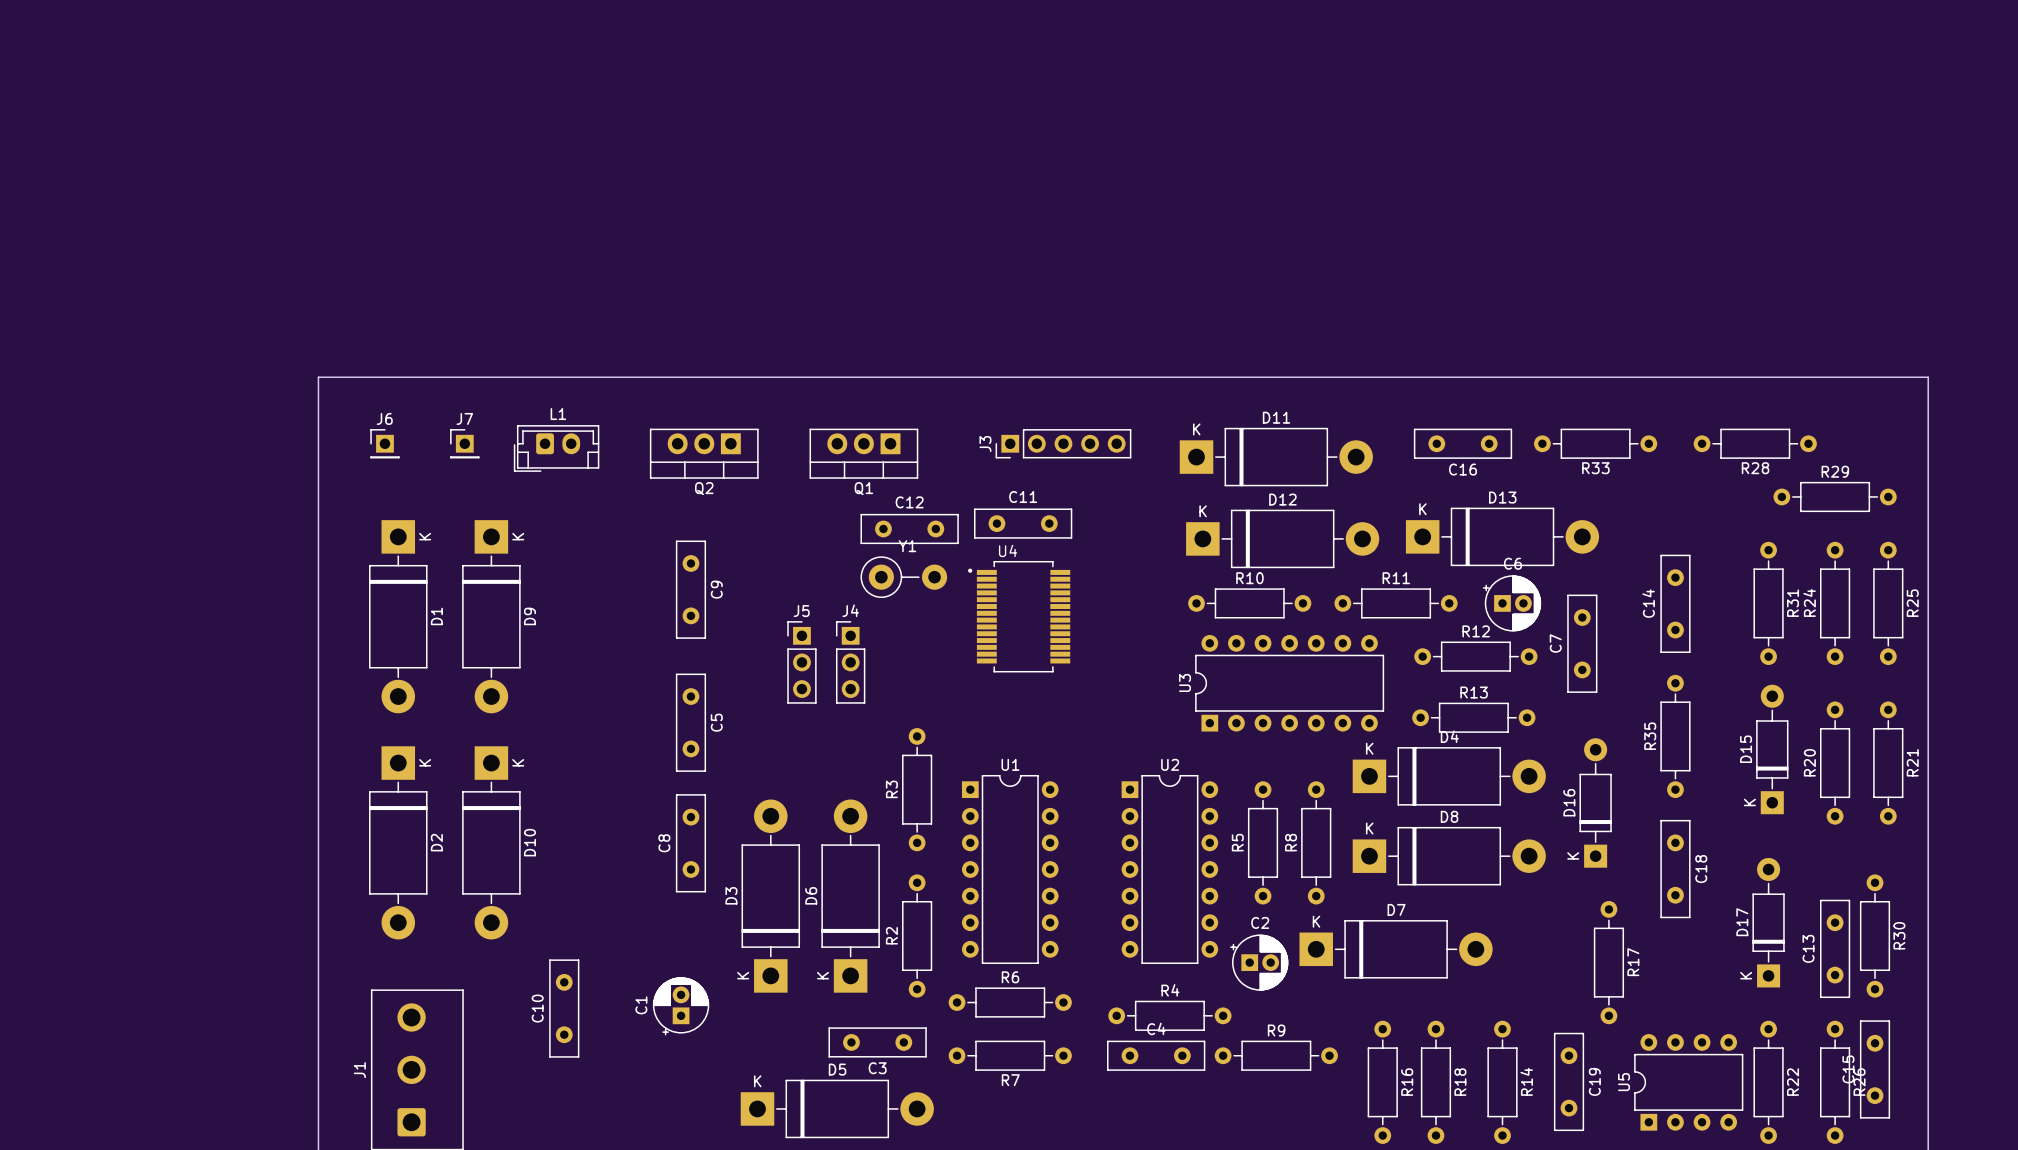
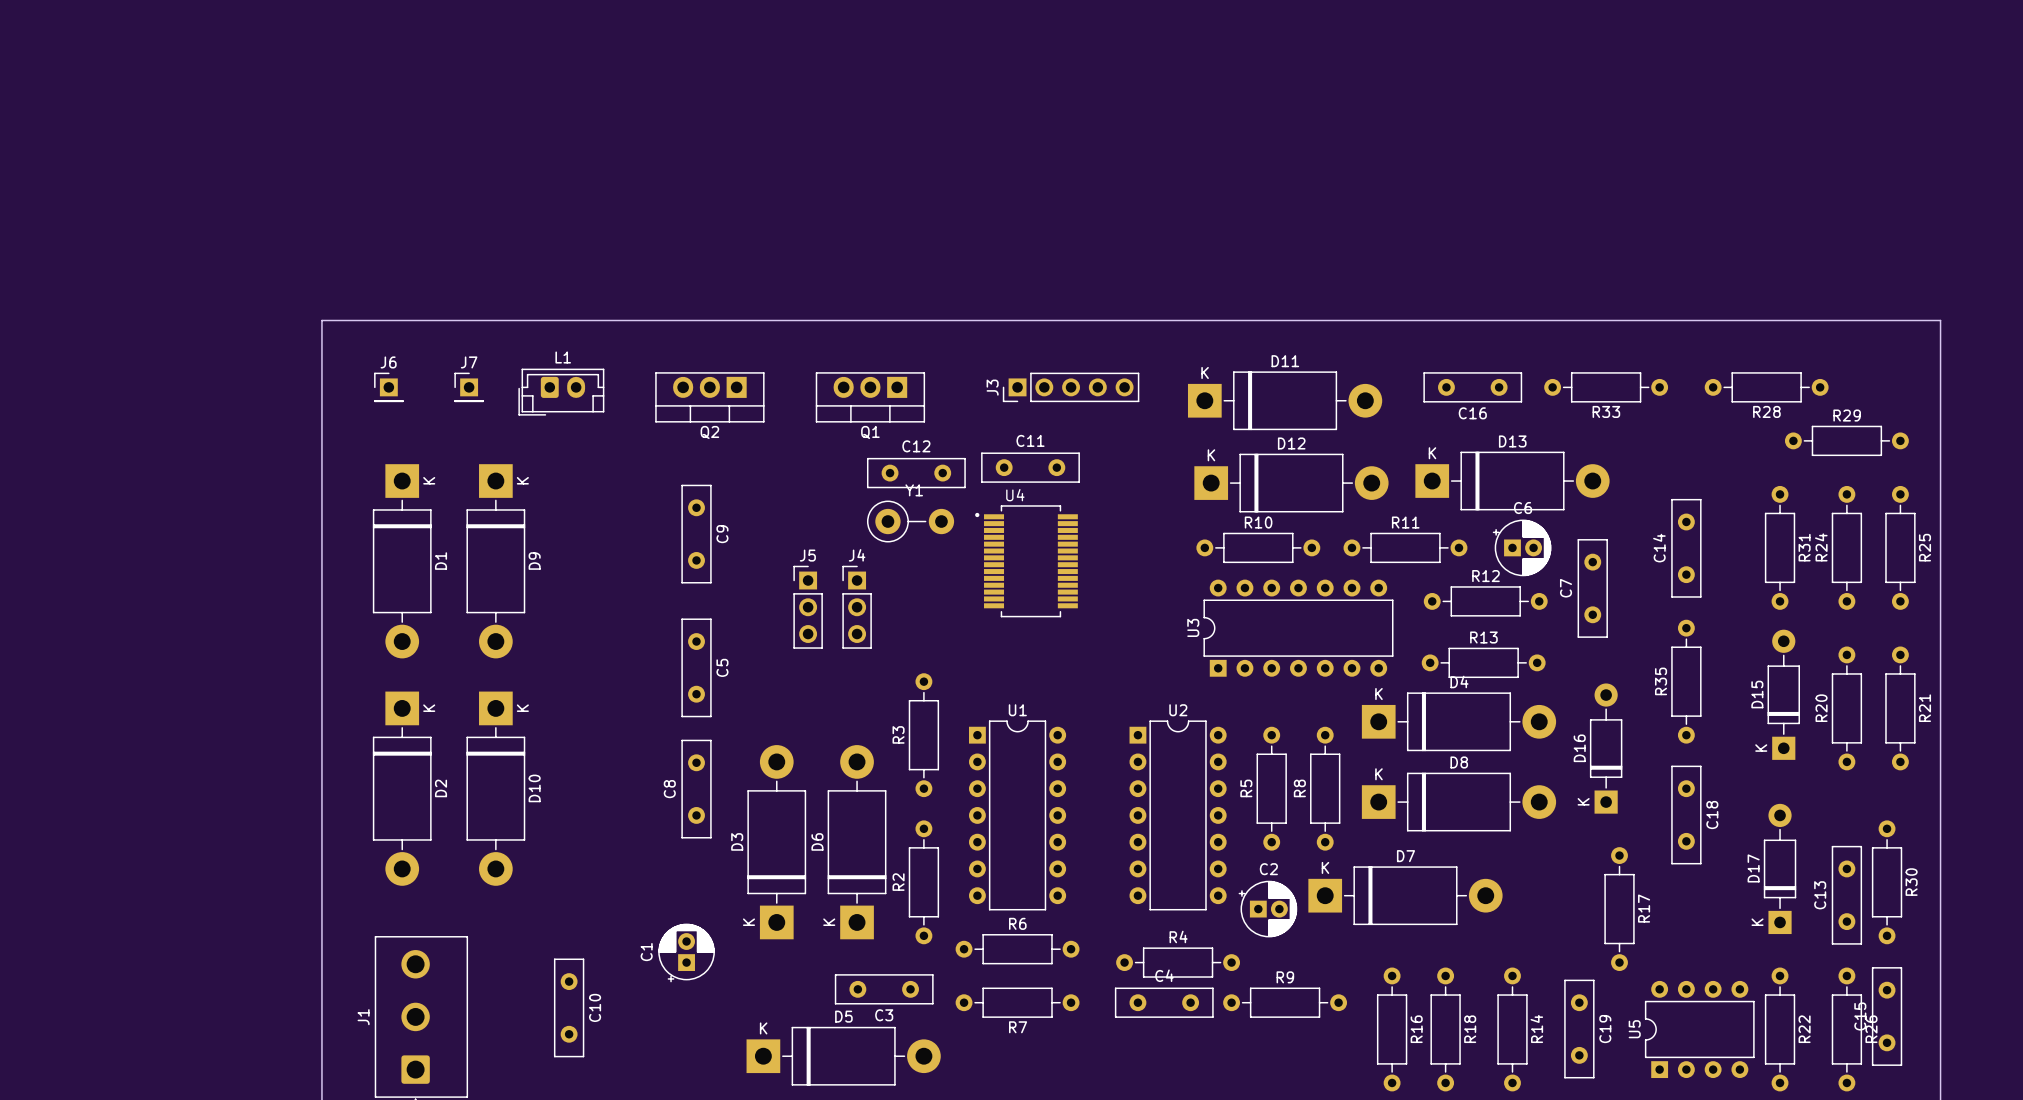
C10 name position: C10 (537, 1008) -> C10 (595, 1007)
C10 position: (564, 1008) -> (569, 1007)

